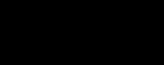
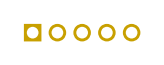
part: none -> (82, 32)

